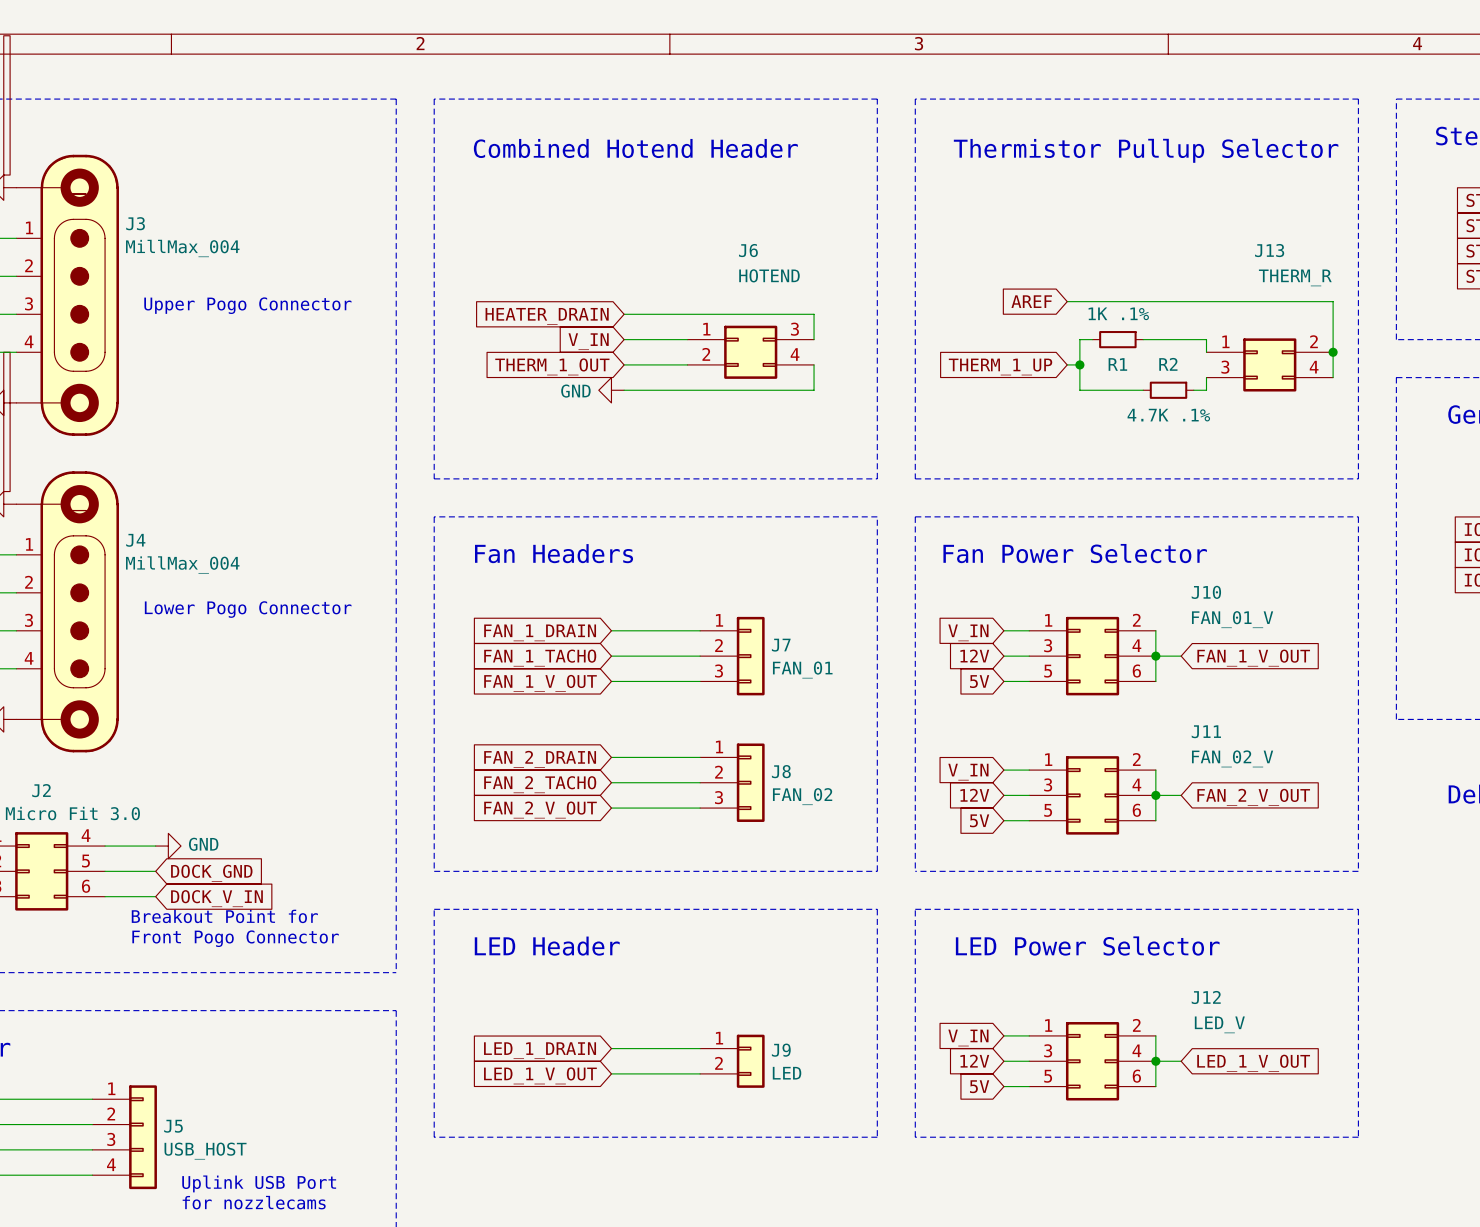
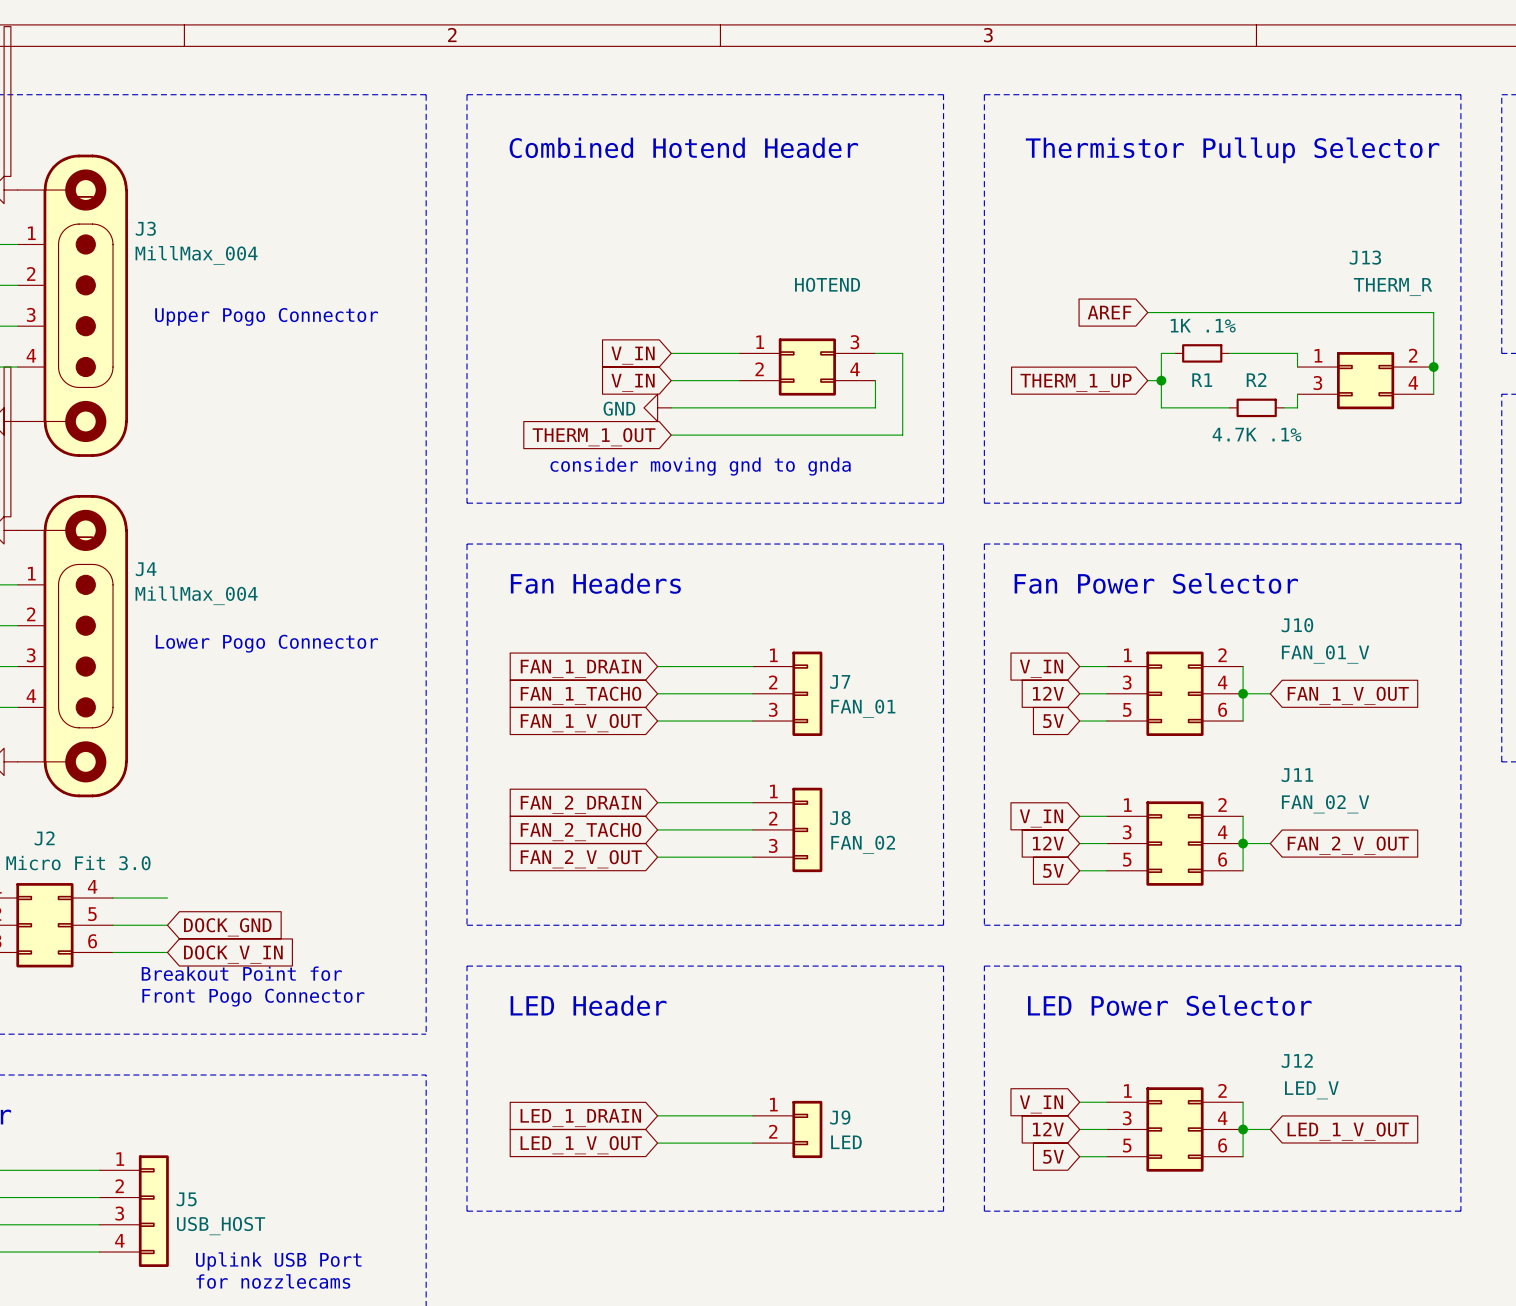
J6 name: J6 (748, 250) -> none
wire: (624, 314) (814, 314) (814, 339) -> (671, 435) (902, 435) (902, 353) (875, 353)
global label: HEATER_DRAIN (547, 316) -> none
global label: THERM_1_OUT (552, 366) -> V_IN (633, 382)
global label: none -> THERM_1_OUT (594, 437)
text: none -> consider moving gnd to gnda (700, 466)
power symbol: GND (168, 846) -> none

